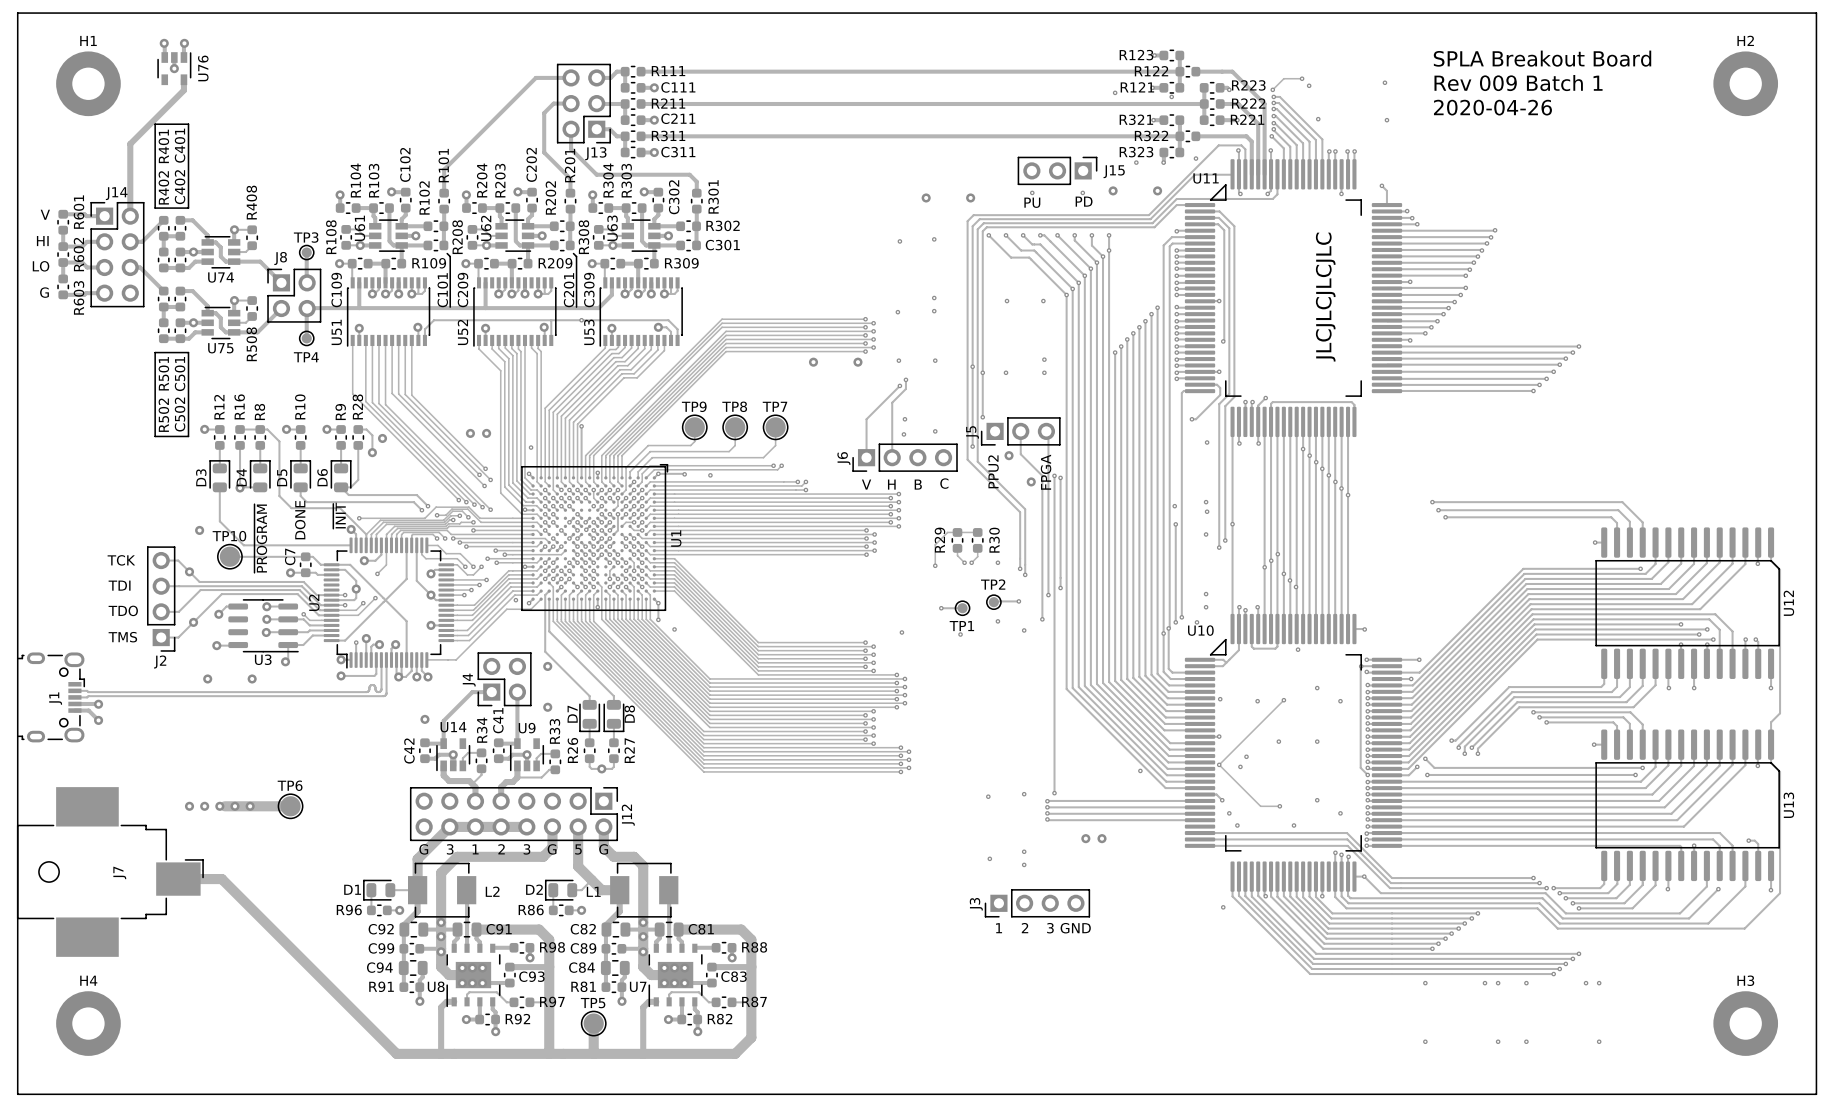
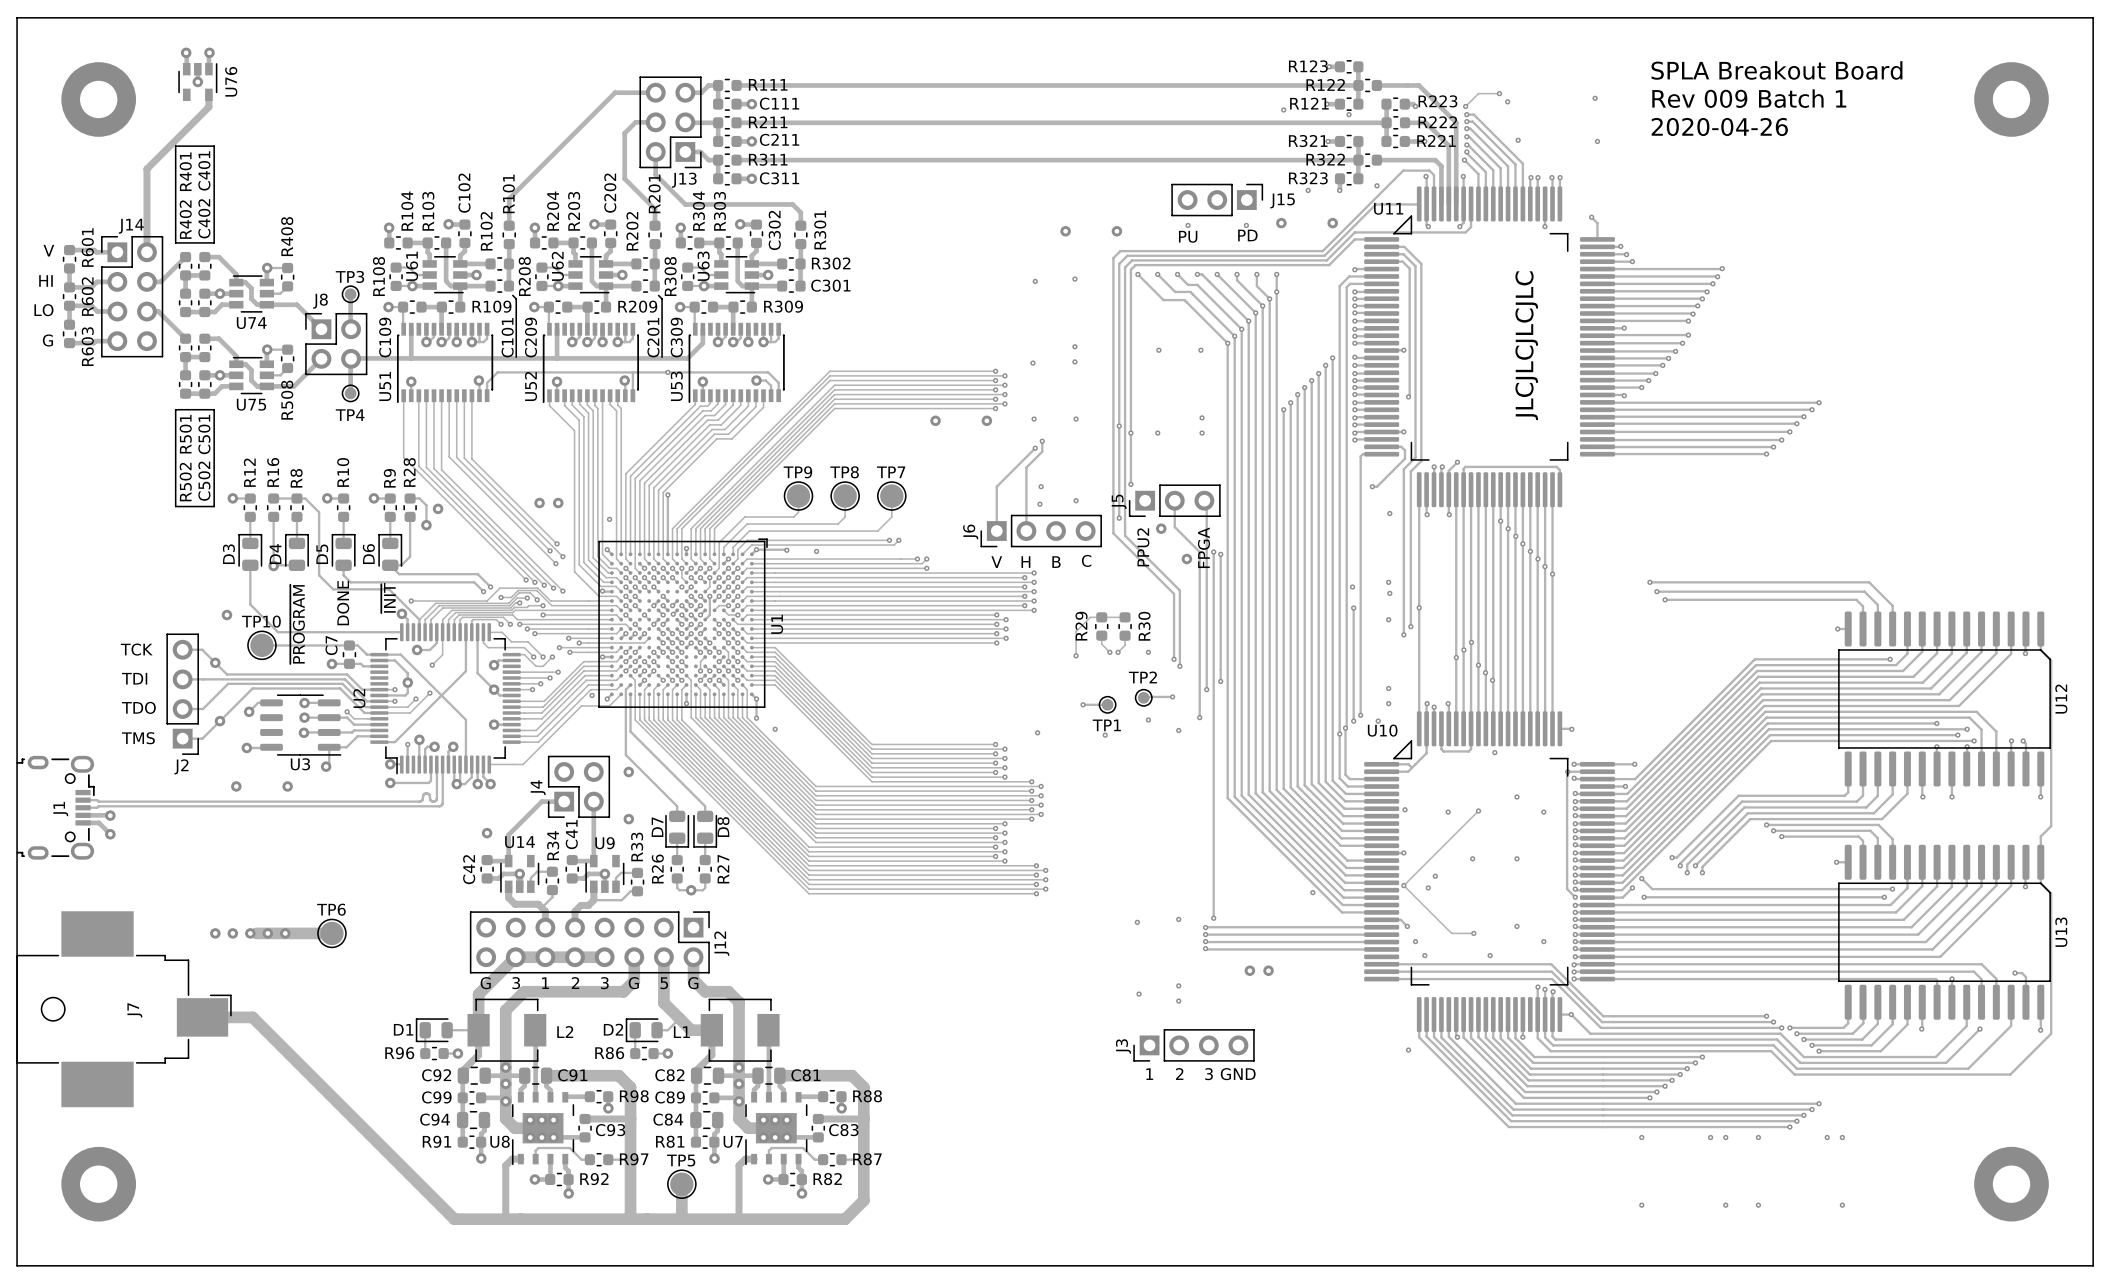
H1 name: H1 (88, 40) -> none
H2 name: H2 (1745, 40) -> none
H4 name: H4 (88, 980) -> none
H3 name: H3 (1745, 980) -> none

